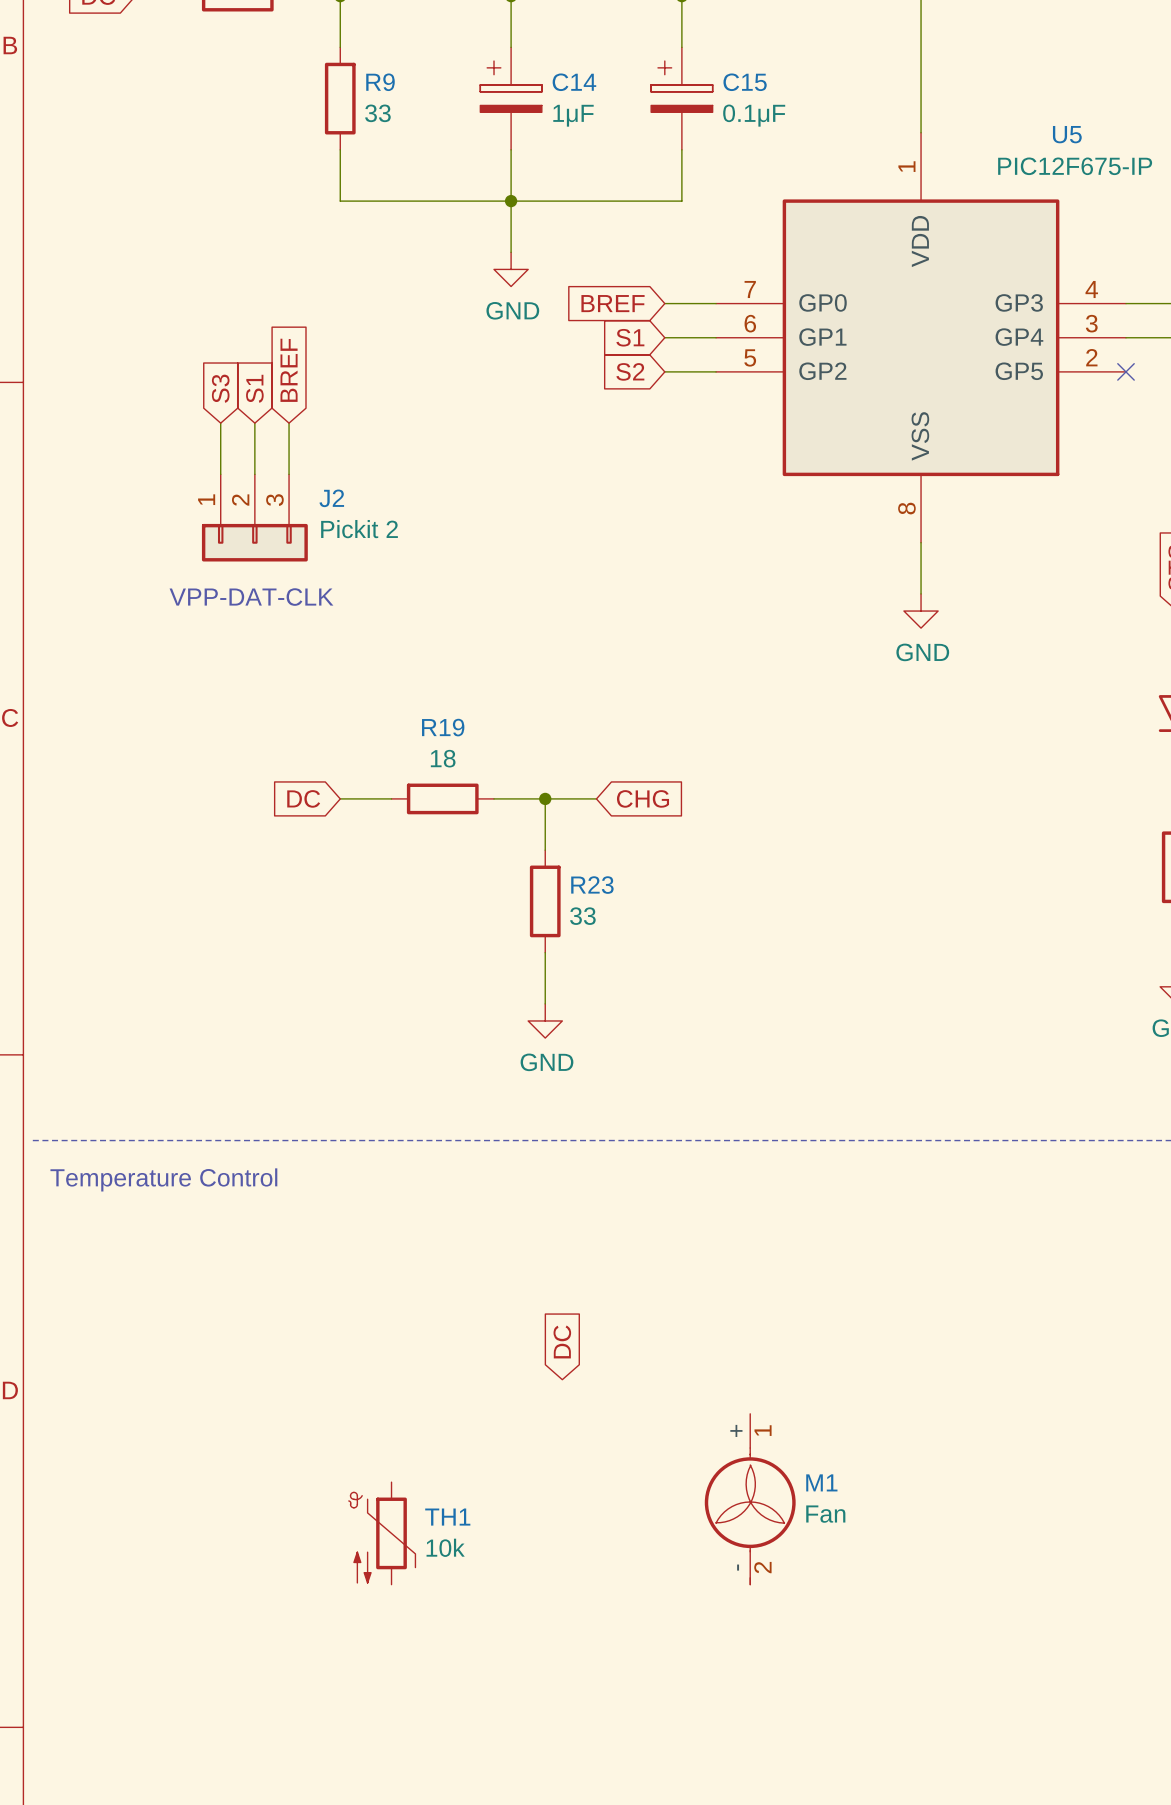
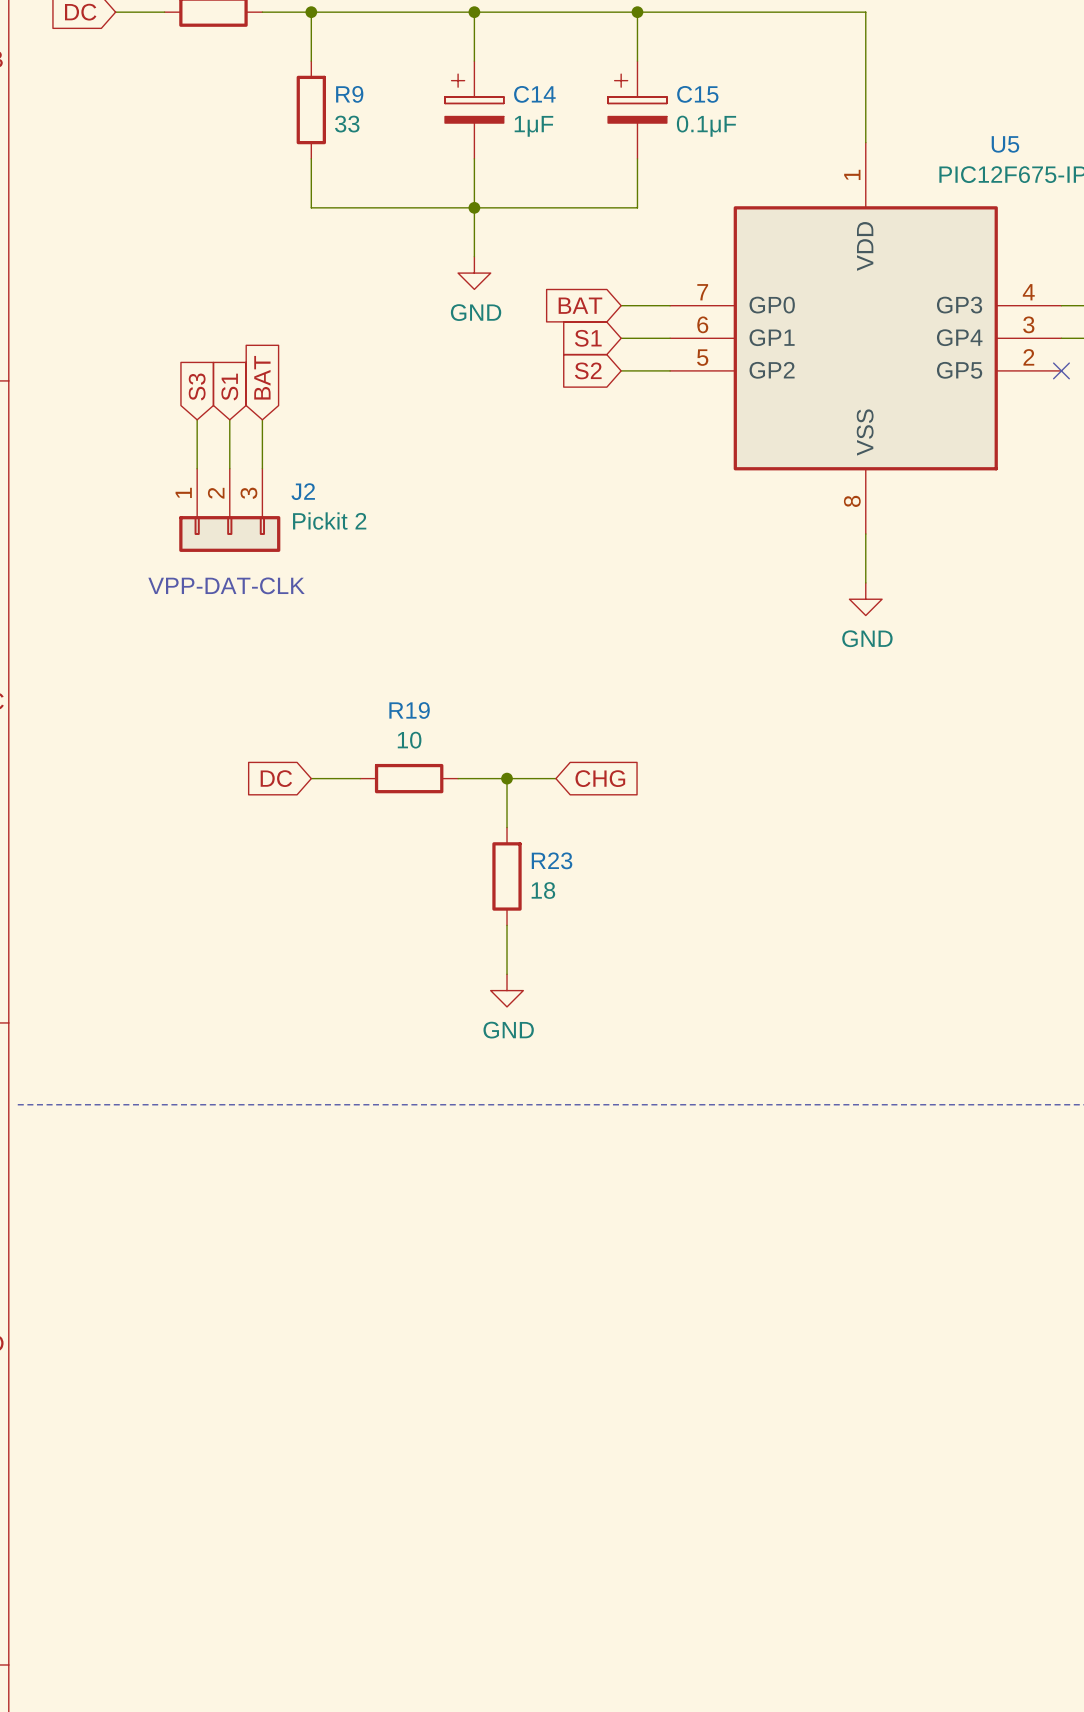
global label: BREF (613, 303) -> BAT (580, 305)
global label: BREF (289, 370) -> BAT (262, 377)
R19 value: 18 (443, 758) -> 10 (409, 740)
R23 value: 33 (582, 916) -> 18 (543, 890)
text: Temperature Control (163, 1179) -> none
global label: DC (562, 1341) -> none
M1: Fan (750, 1499) -> none
TH1: 10k (382, 1533) -> none

